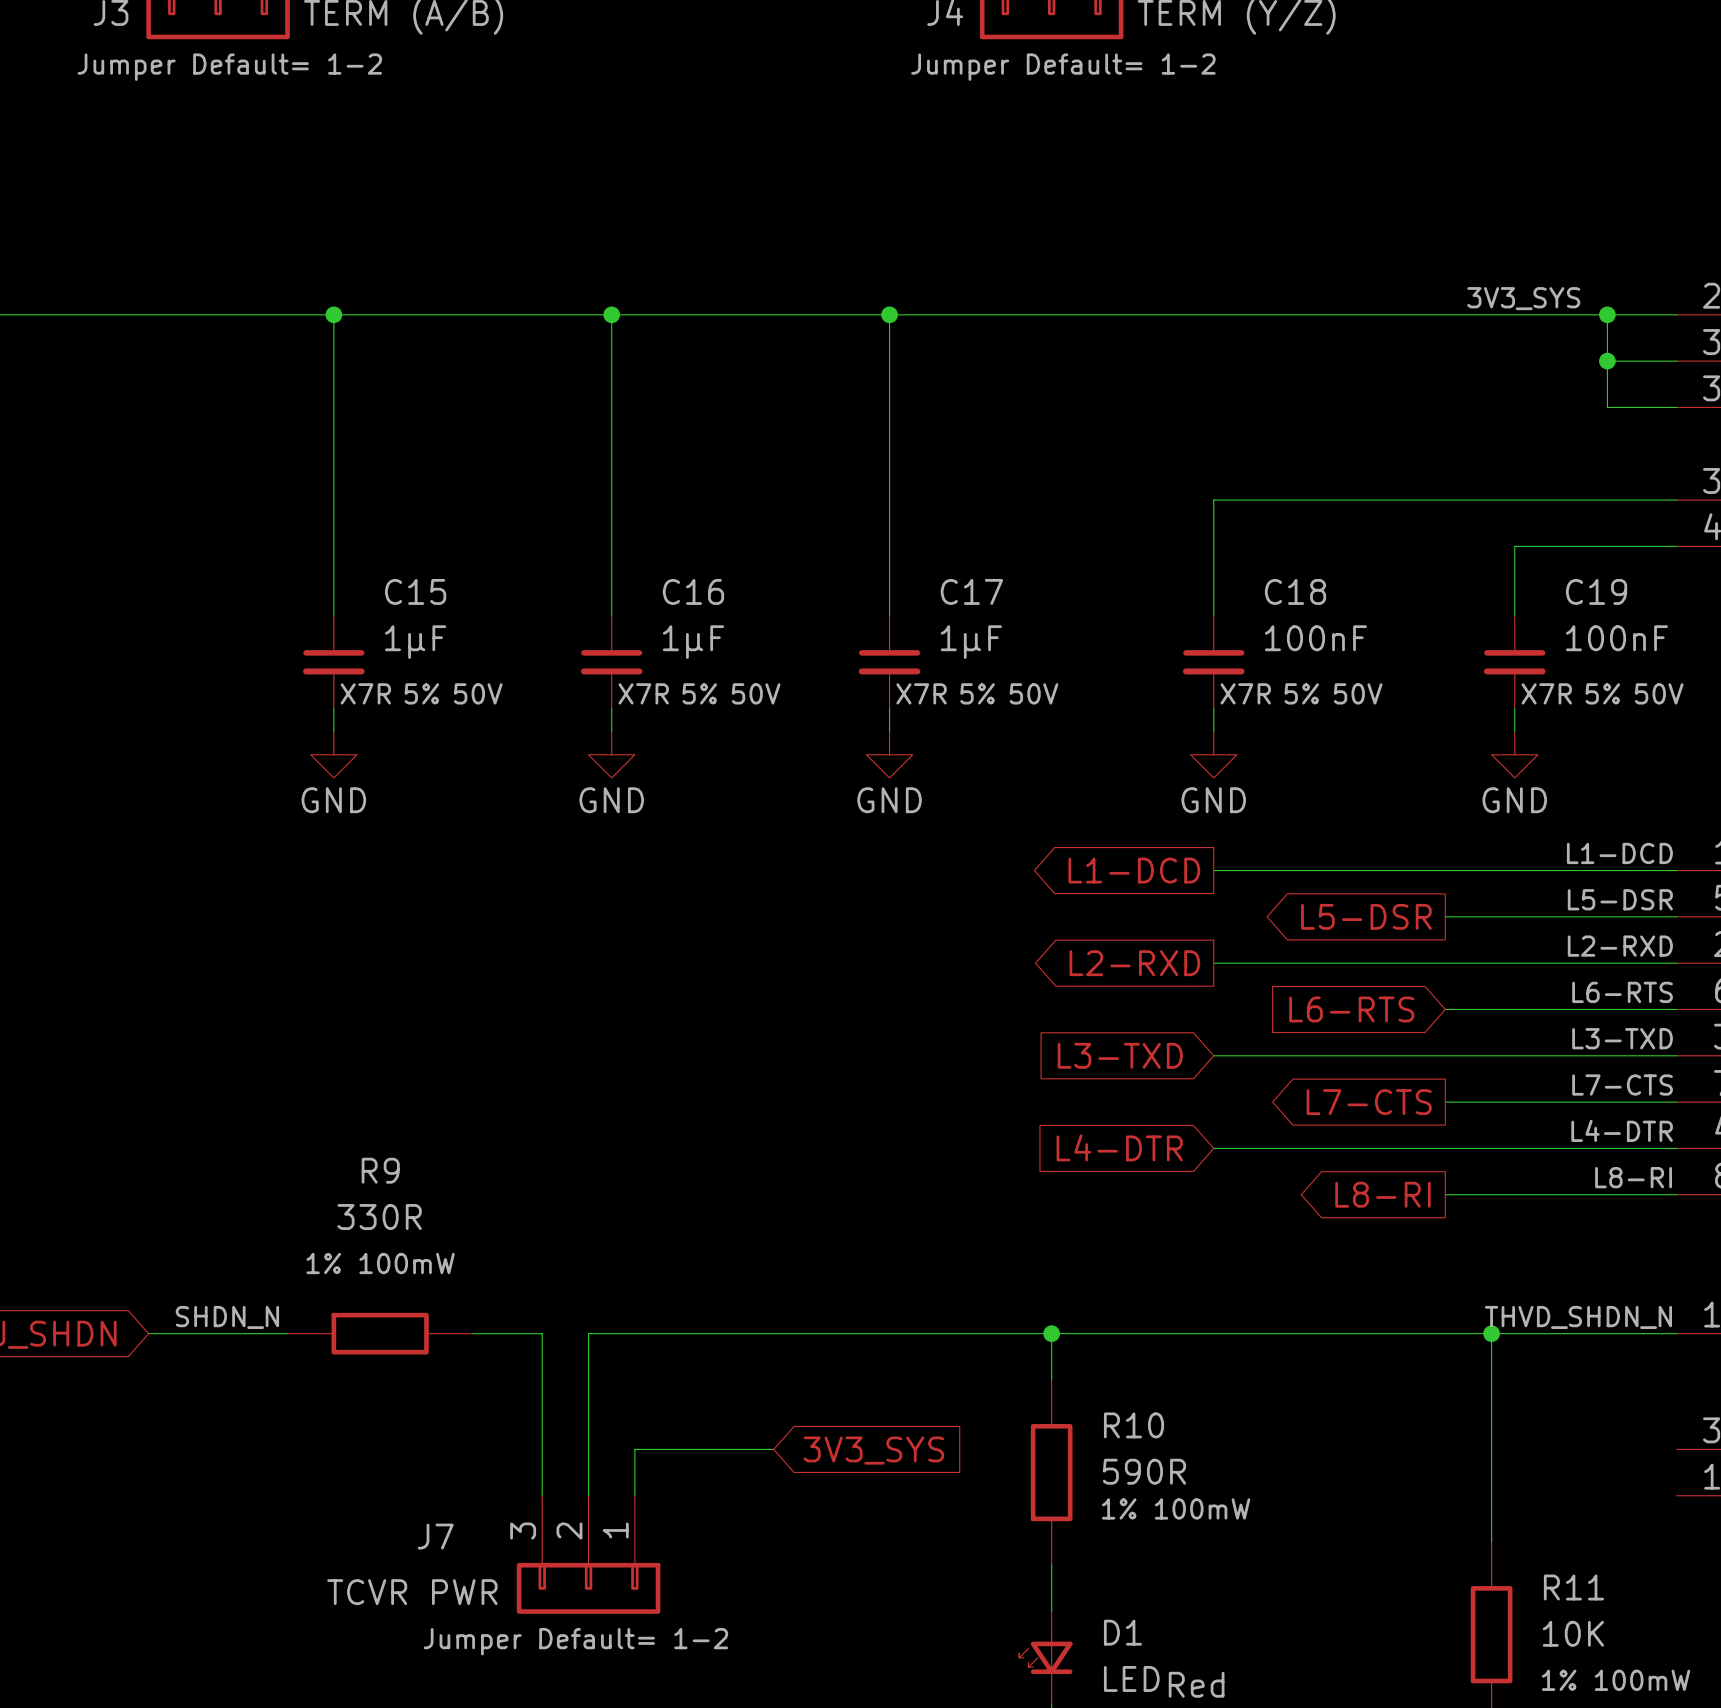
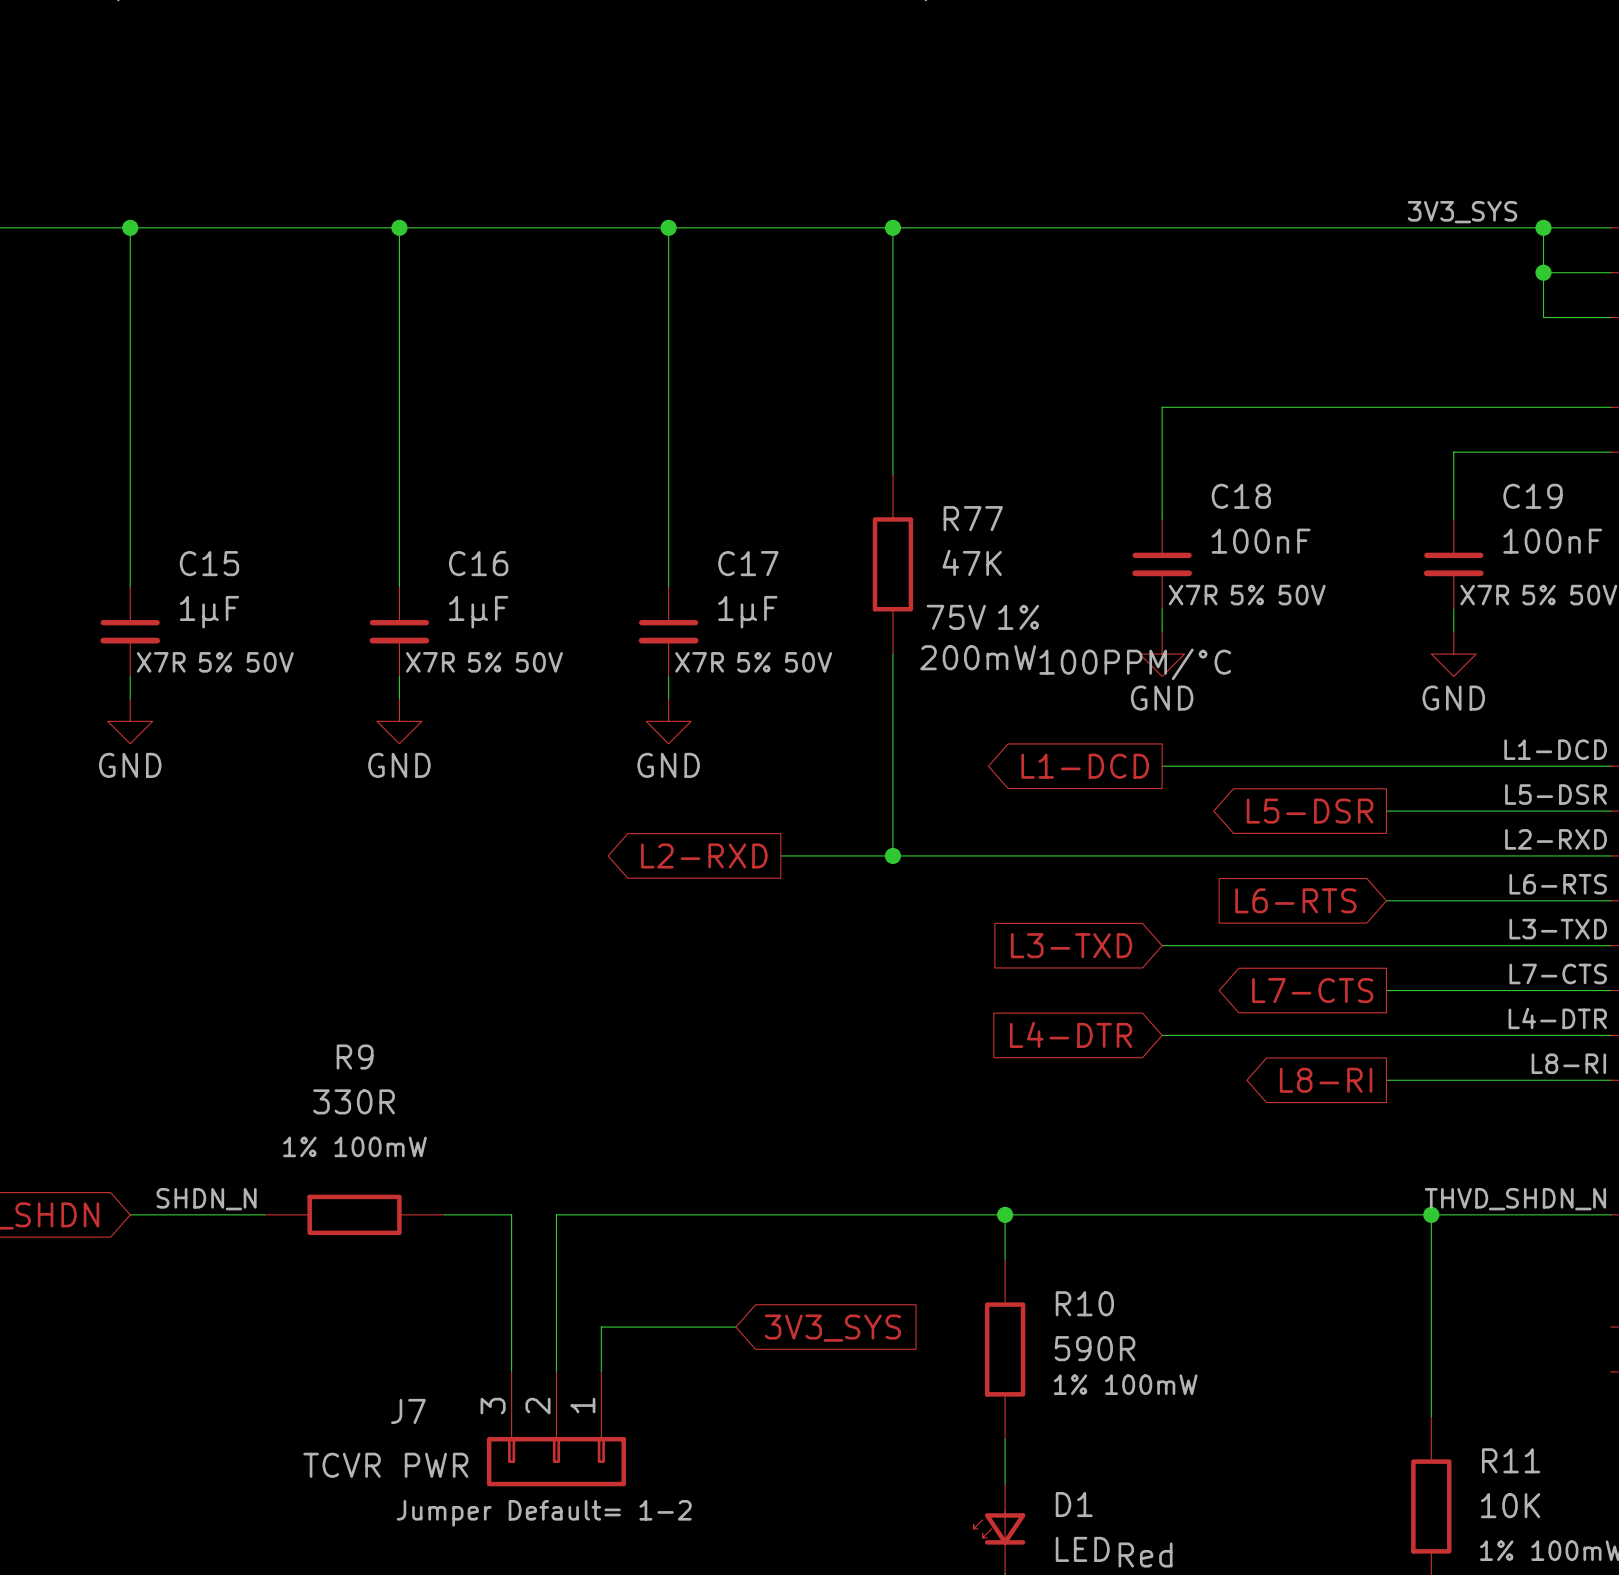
wire: none -> (130, 227) (130, 586)
junction: none -> (130, 227)
wire: (333, 314) (333, 615) -> none
junction: (333, 314) -> none
wire: none -> (399, 227) (399, 586)
junction: none -> (399, 227)
wire: (611, 314) (611, 615) -> none
junction: (611, 314) -> none
wire: none -> (668, 227) (668, 586)
junction: none -> (668, 227)
wire: (889, 314) (889, 615) -> none
junction position: (889, 314) -> (892, 227)
wire: none -> (892, 227) (892, 474)
C15 position: (333, 662) -> (130, 631)
C16 position: (611, 662) -> (399, 631)
C17 position: (889, 662) -> (668, 631)
R77: none -> 47K (892, 564)
wire: (333, 708) (333, 731) -> (130, 676) (130, 698)
wire: (611, 708) (611, 731) -> (399, 676) (399, 698)
wire: (889, 708) (889, 731) -> (668, 676) (668, 698)
power symbol: GND (333, 754) -> none
power symbol: GND (611, 754) -> none
power symbol: GND (889, 754) -> none
wire: none -> (892, 654) (892, 855)
power symbol: none -> GND (130, 721)
power symbol: none -> GND (399, 721)
power symbol: none -> GND (668, 721)
wire: none -> (780, 855) (1162, 855)
junction: none -> (892, 855)
global label position: L2-RXD (1134, 963) -> L2-RXD (704, 855)

